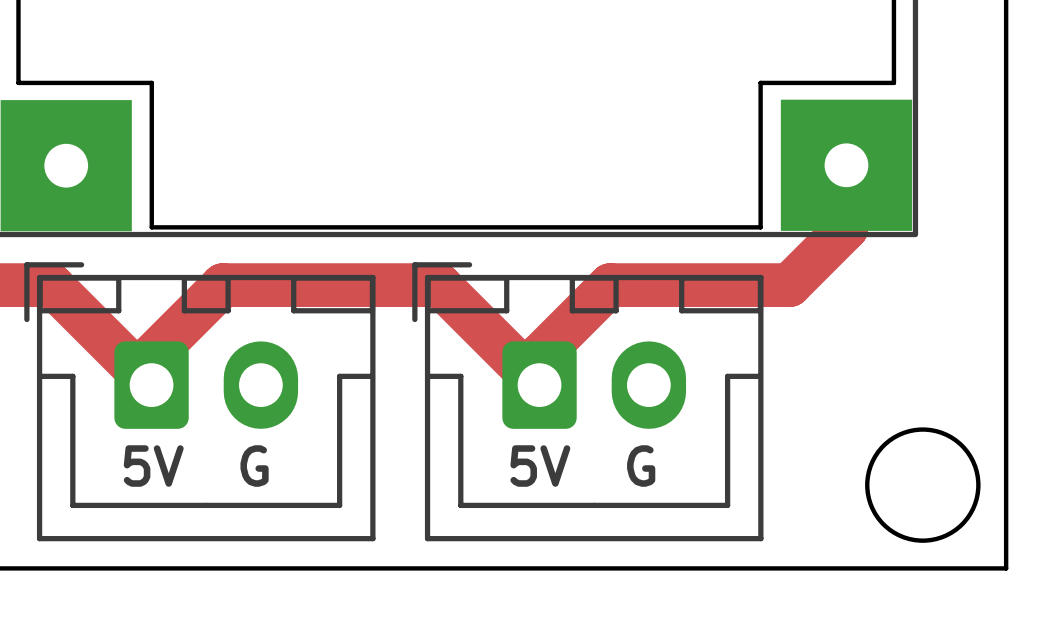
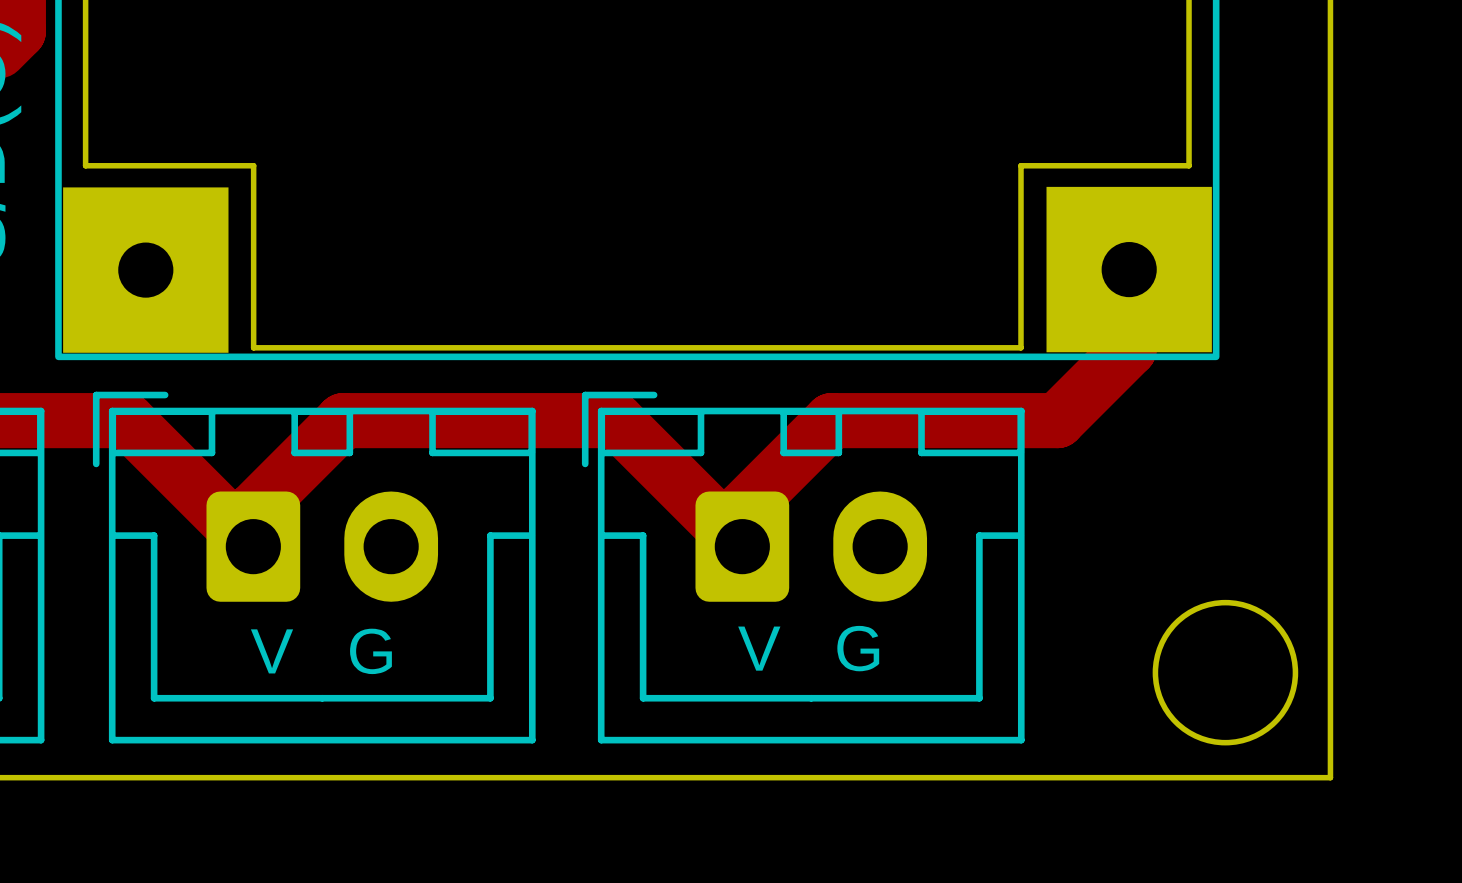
text: 5V G (196, 466) -> V G (321, 651)
text: 5V G (582, 466) -> V G (808, 648)

